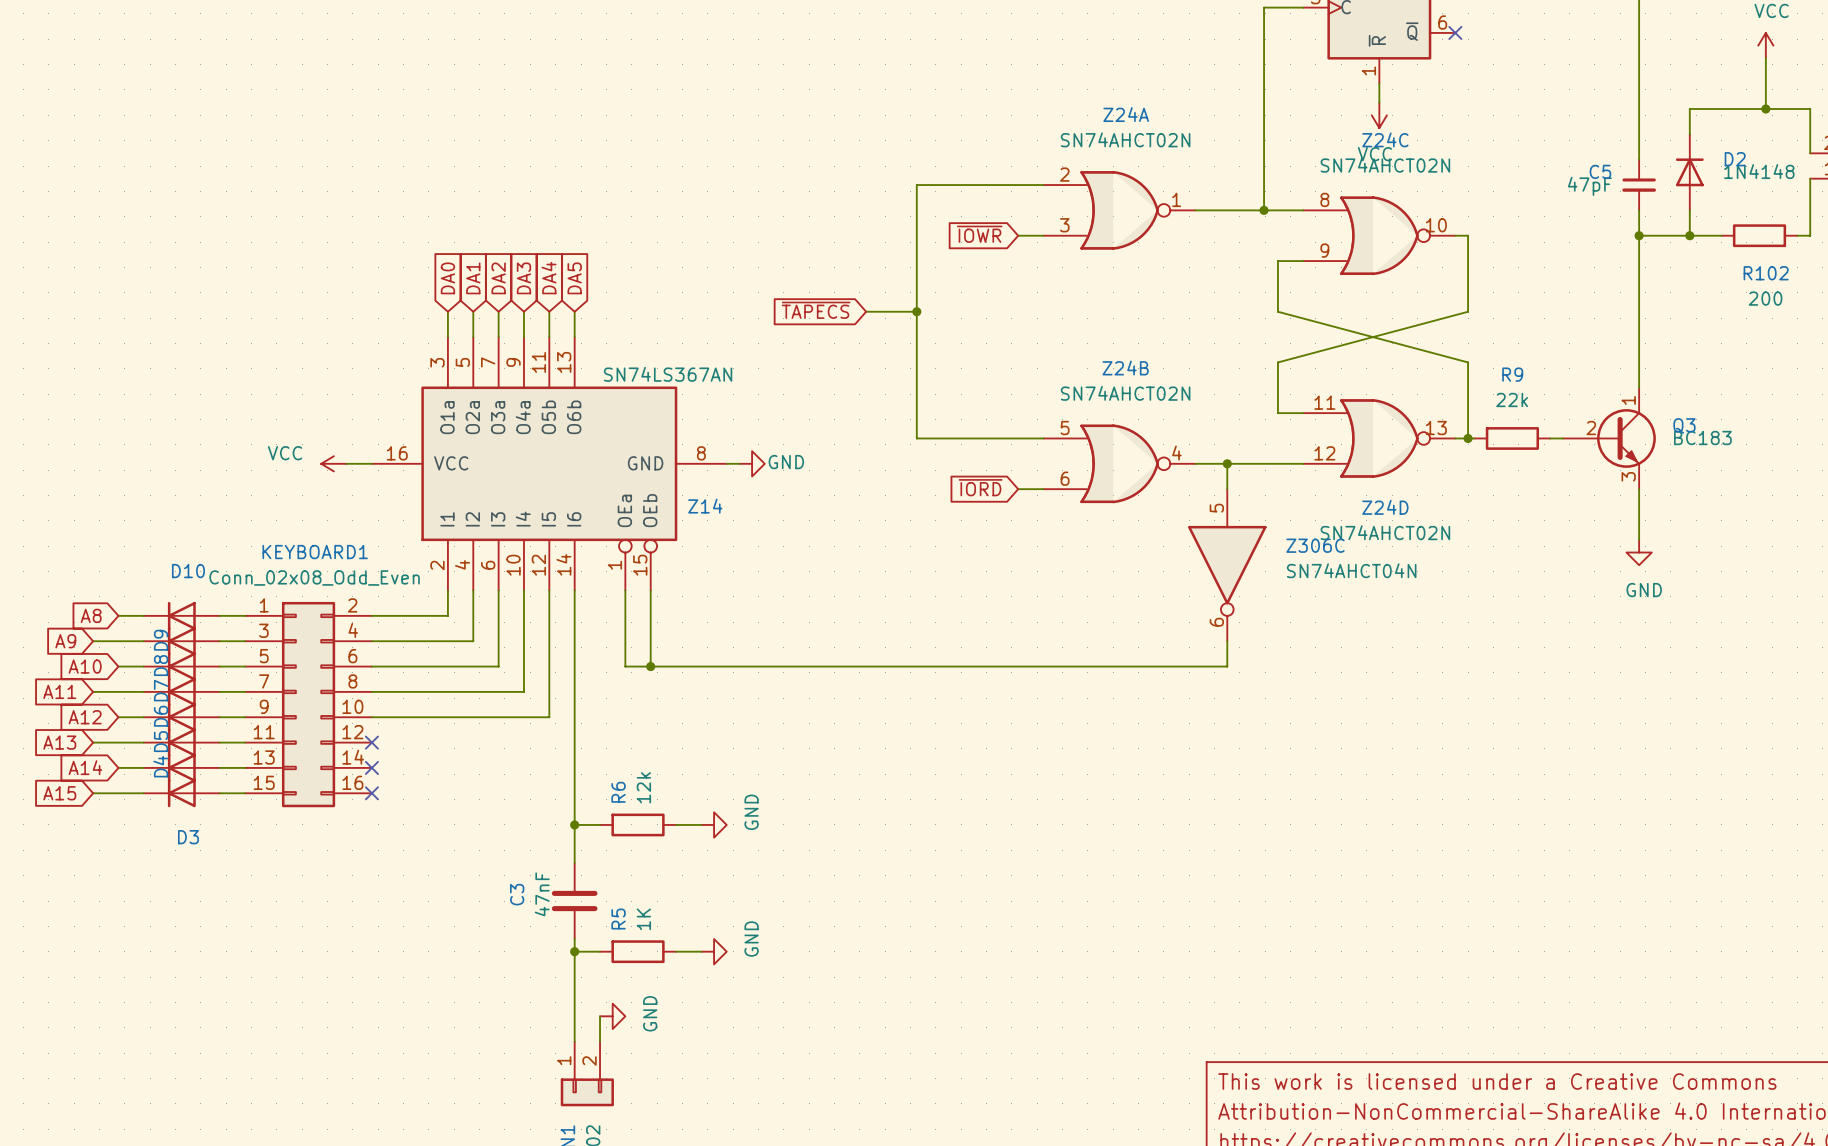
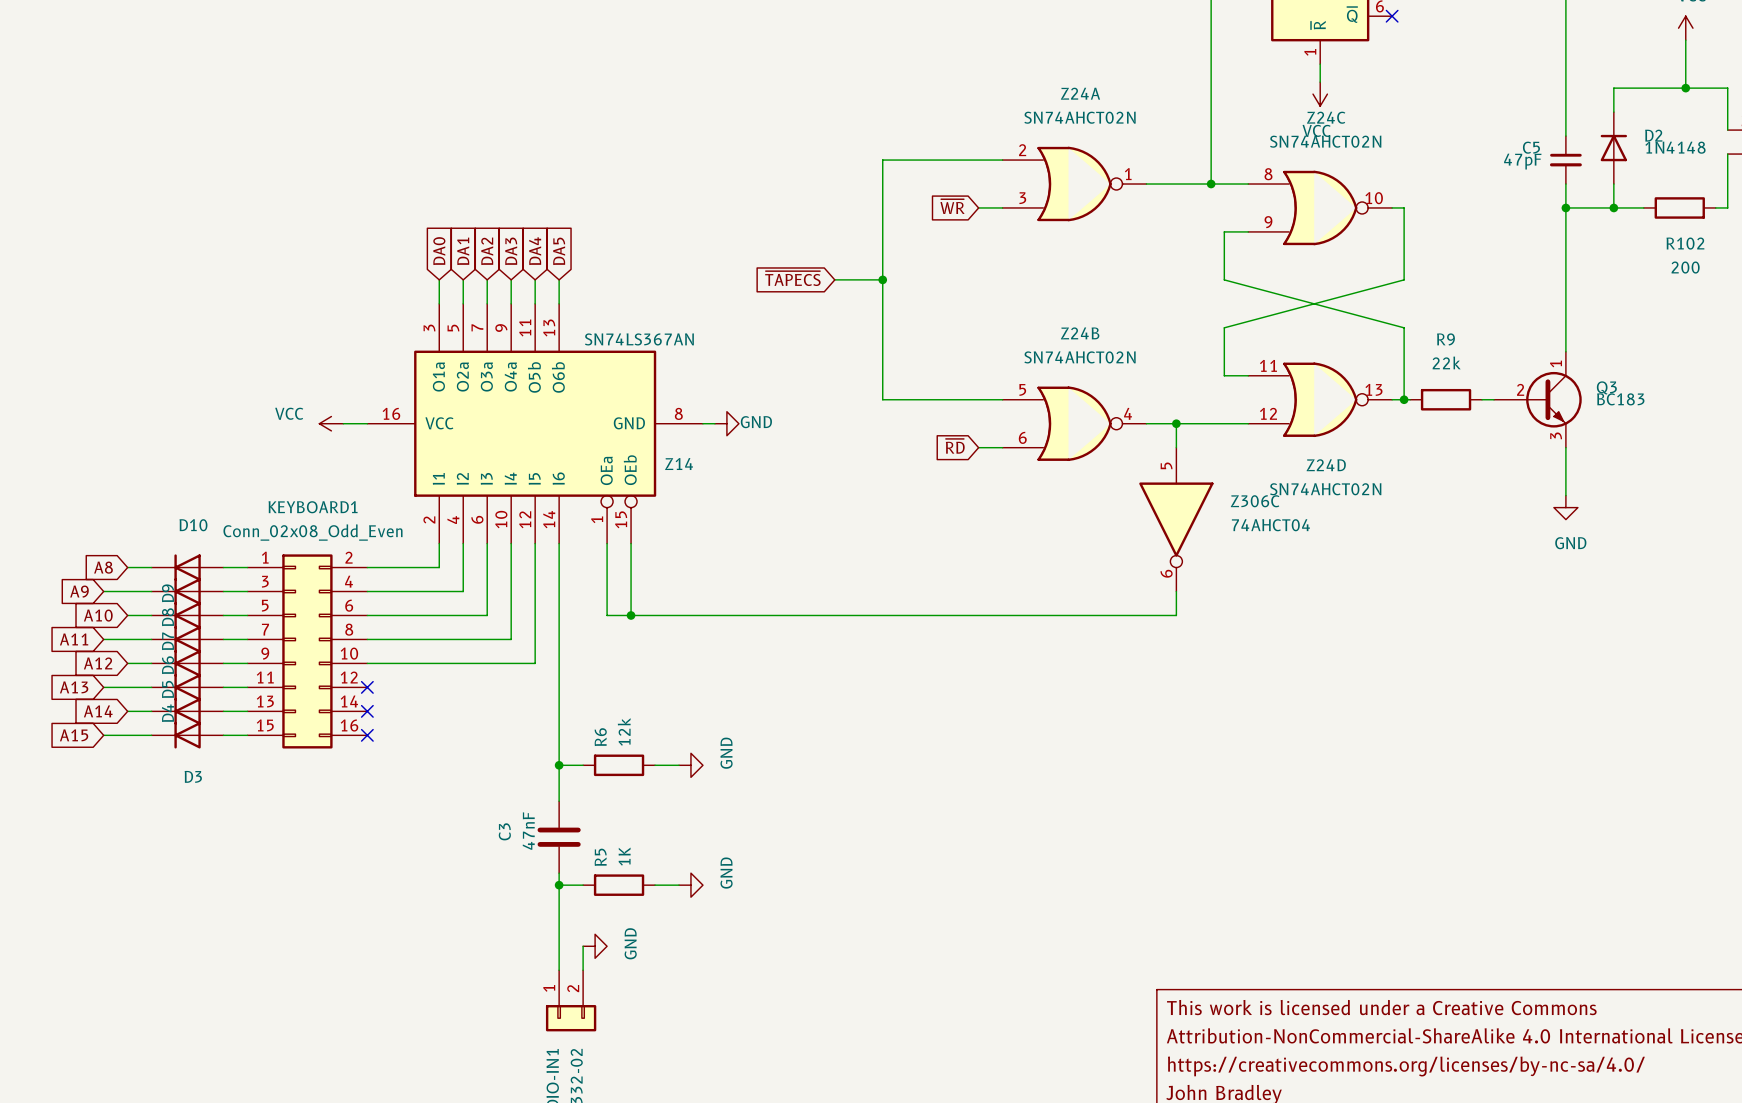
global label: ~{IOWR} (979, 234) -> ~{WR} (952, 206)
global label: ~{IORD} (980, 487) -> ~{RD} (955, 446)
Z306C value: SN74AHCT04N (1351, 570) -> 74AHCT04 (1270, 525)

